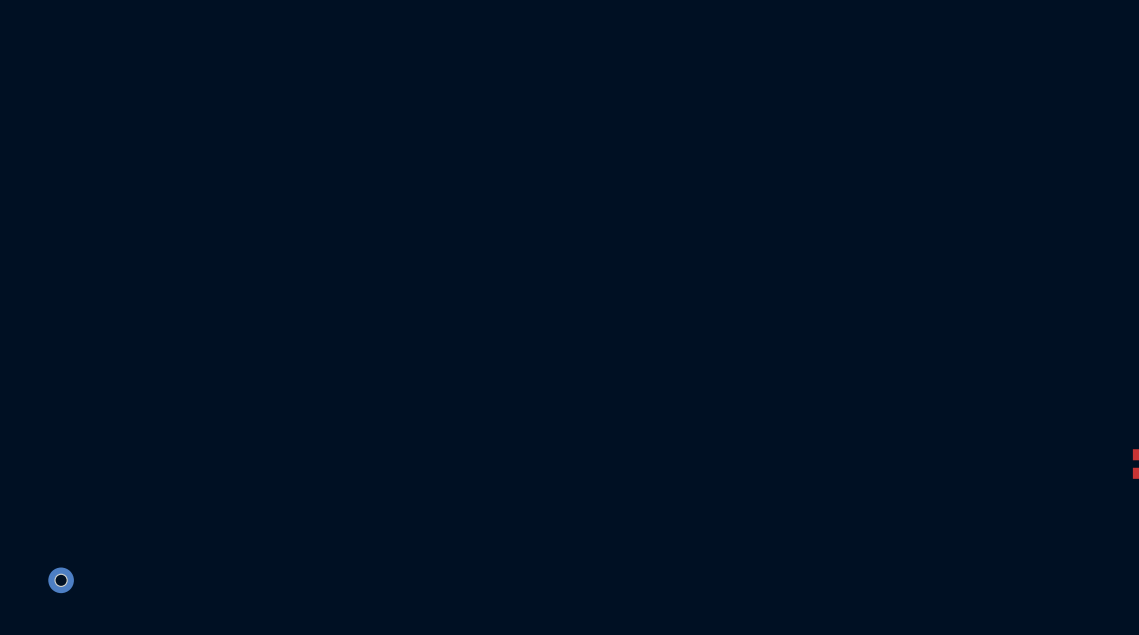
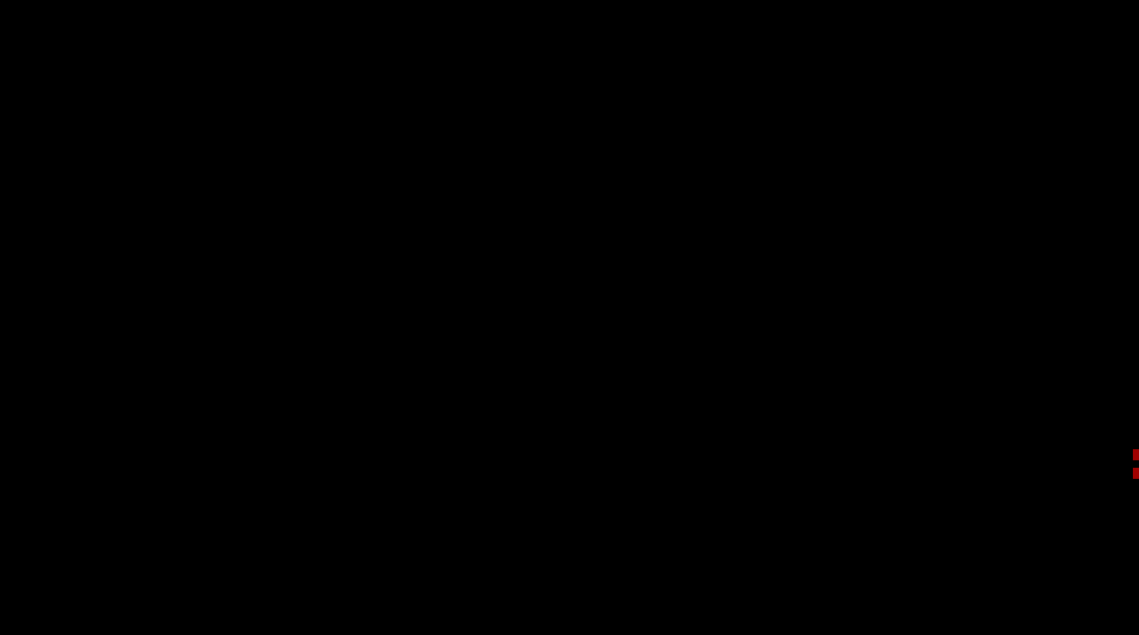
part: (61, 580) -> none

